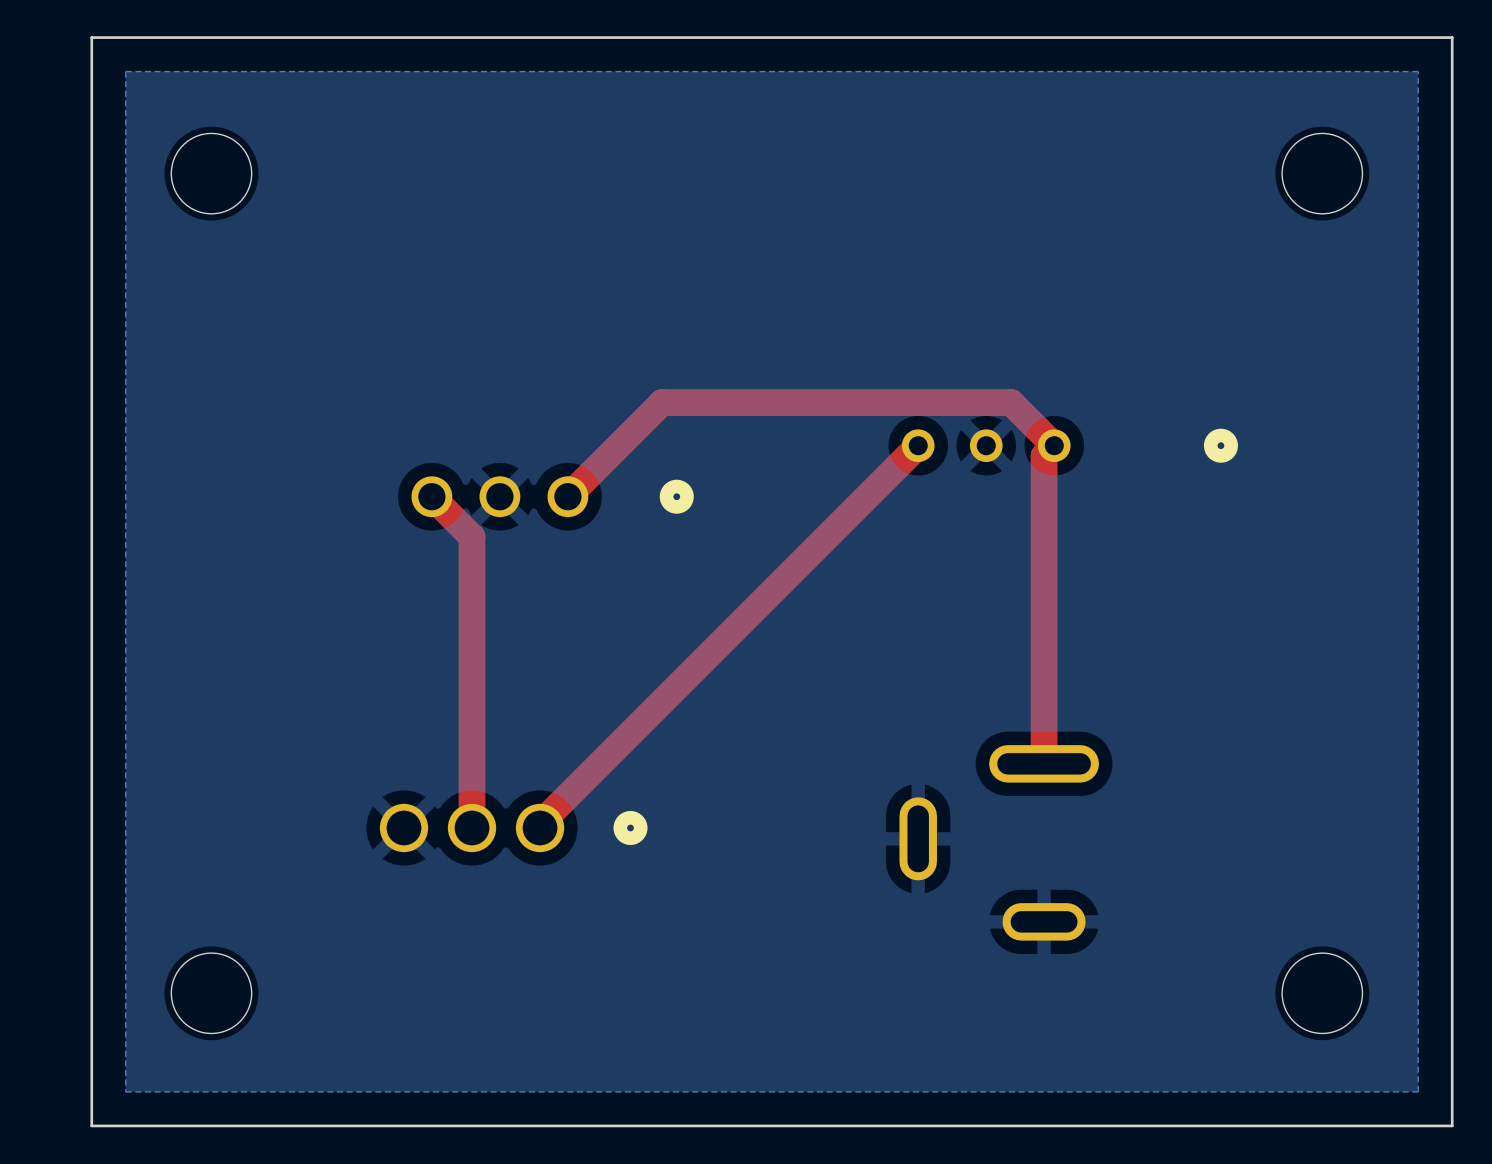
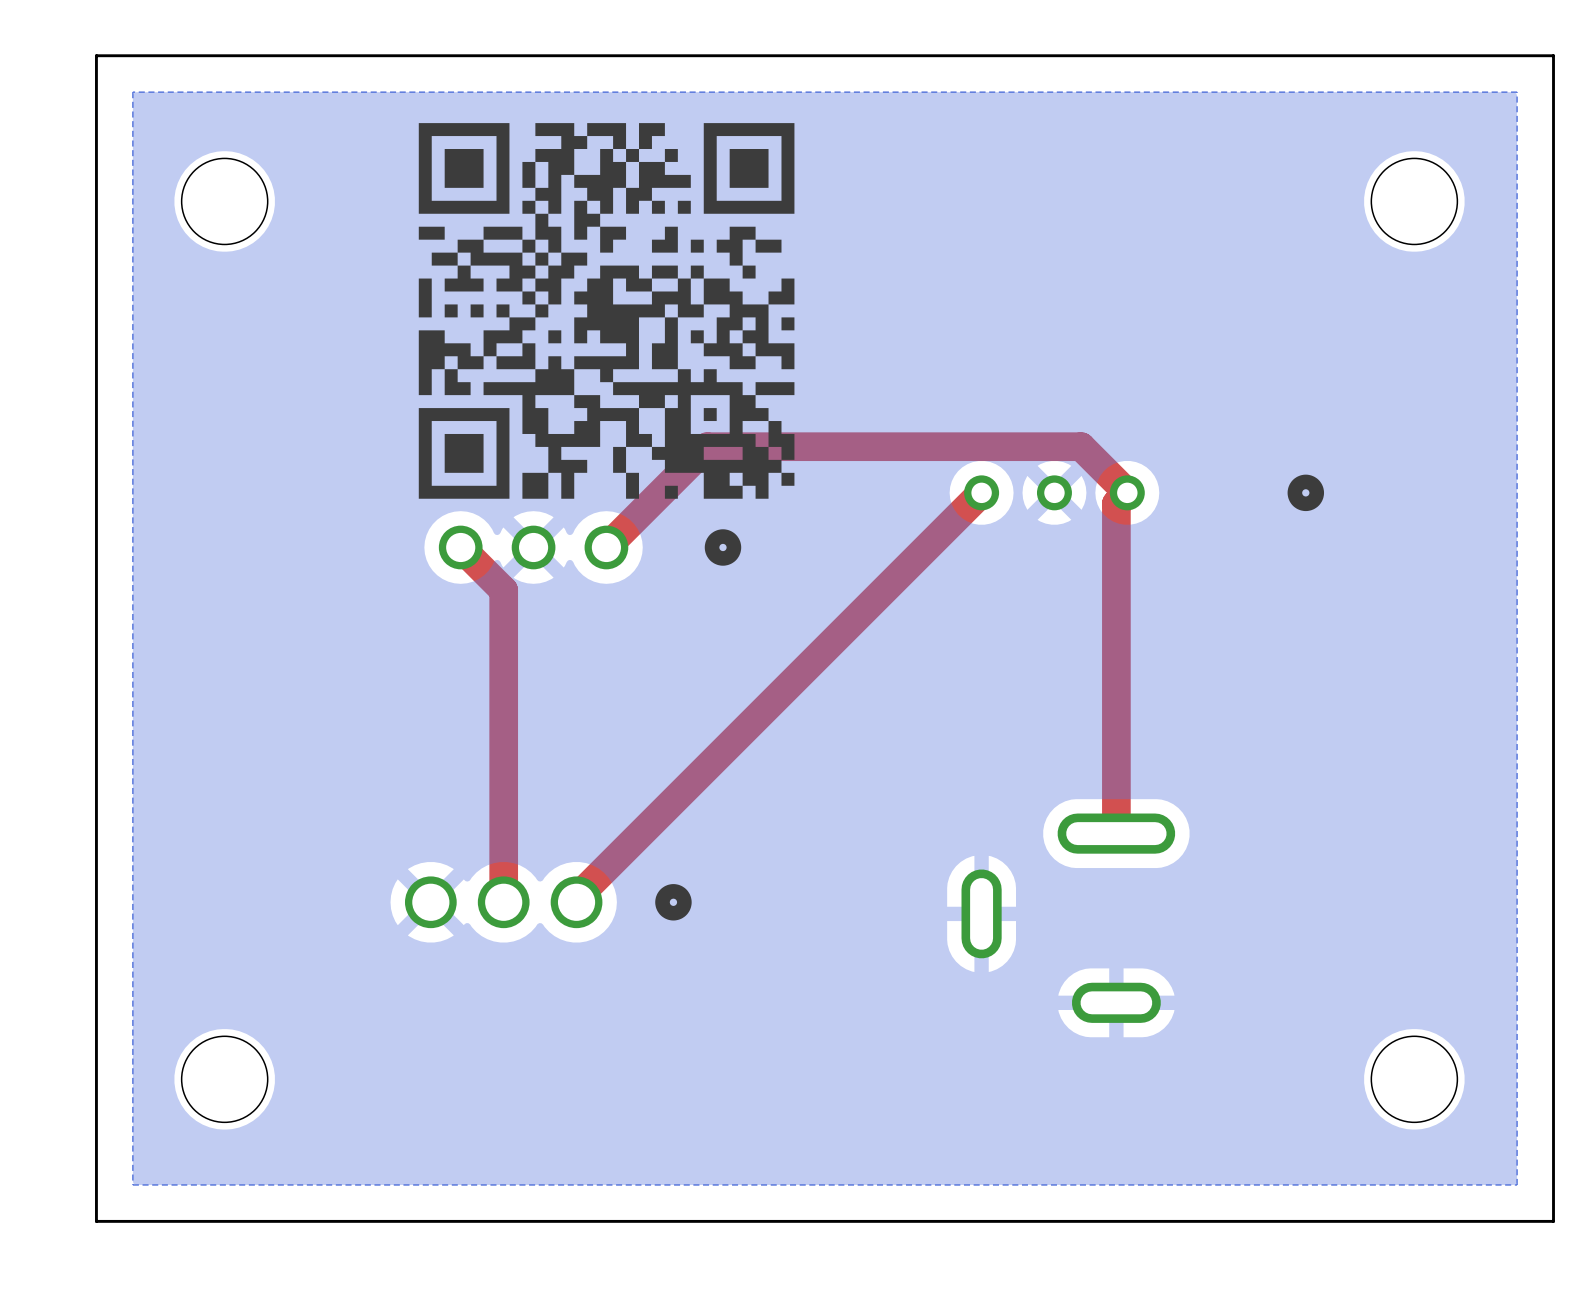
drawing: none -> [418, 123, 795, 499]

